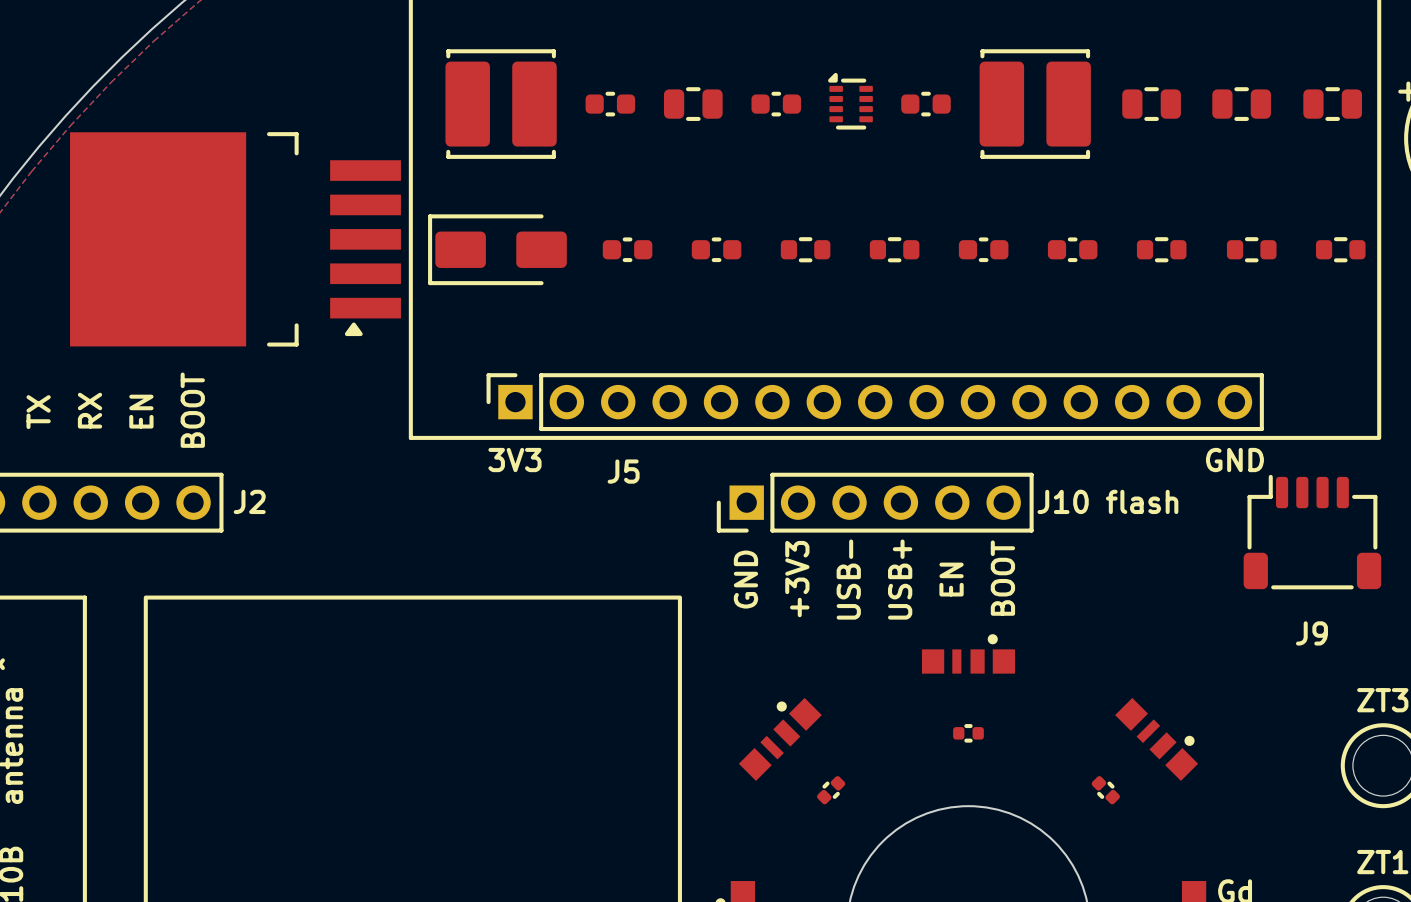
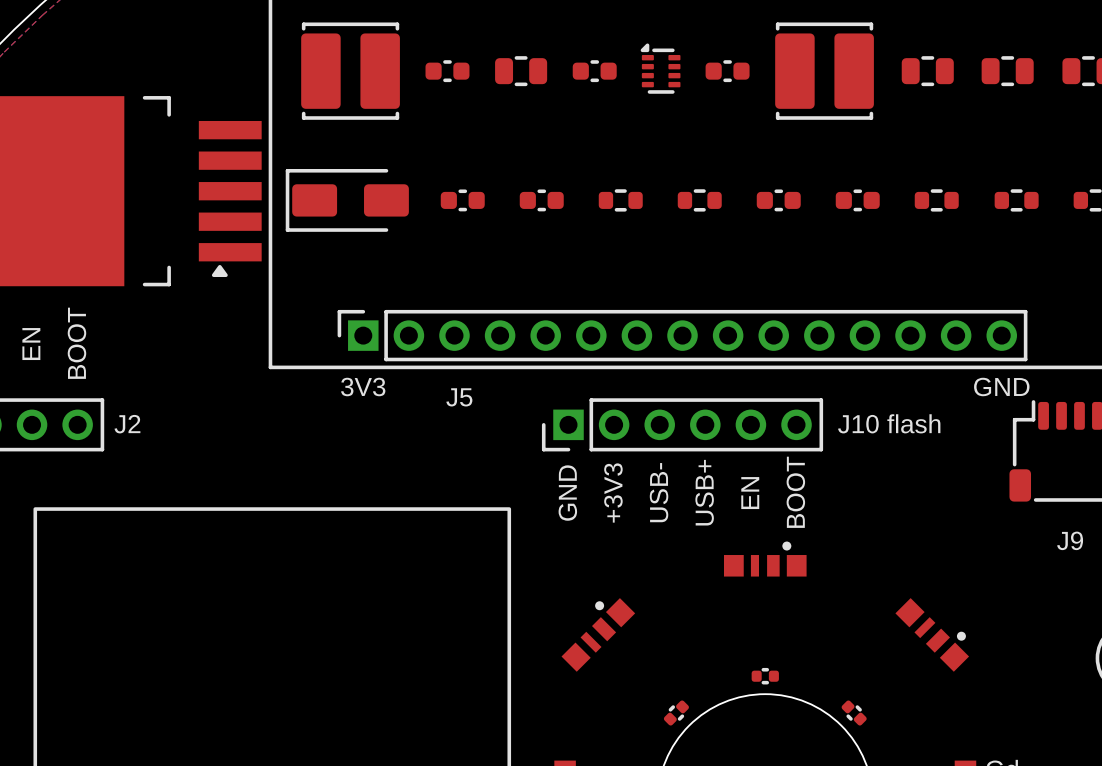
part position: (968, 733) -> (765, 676)
part position: (831, 790) -> (676, 713)
part position: (1105, 790) -> (854, 713)

